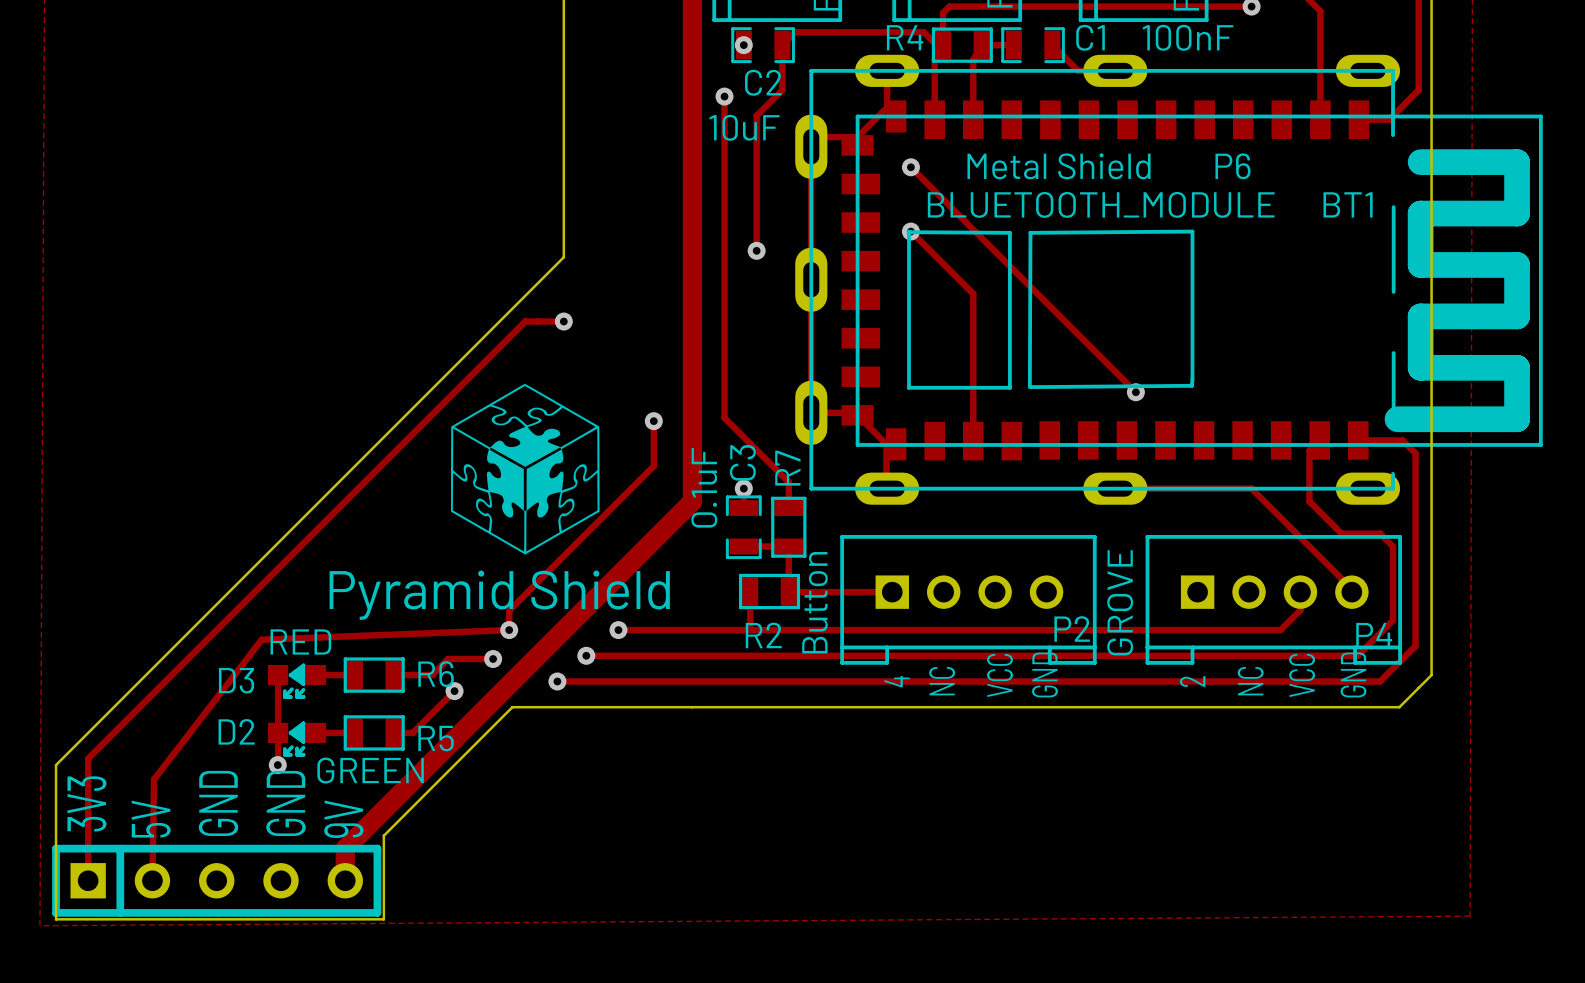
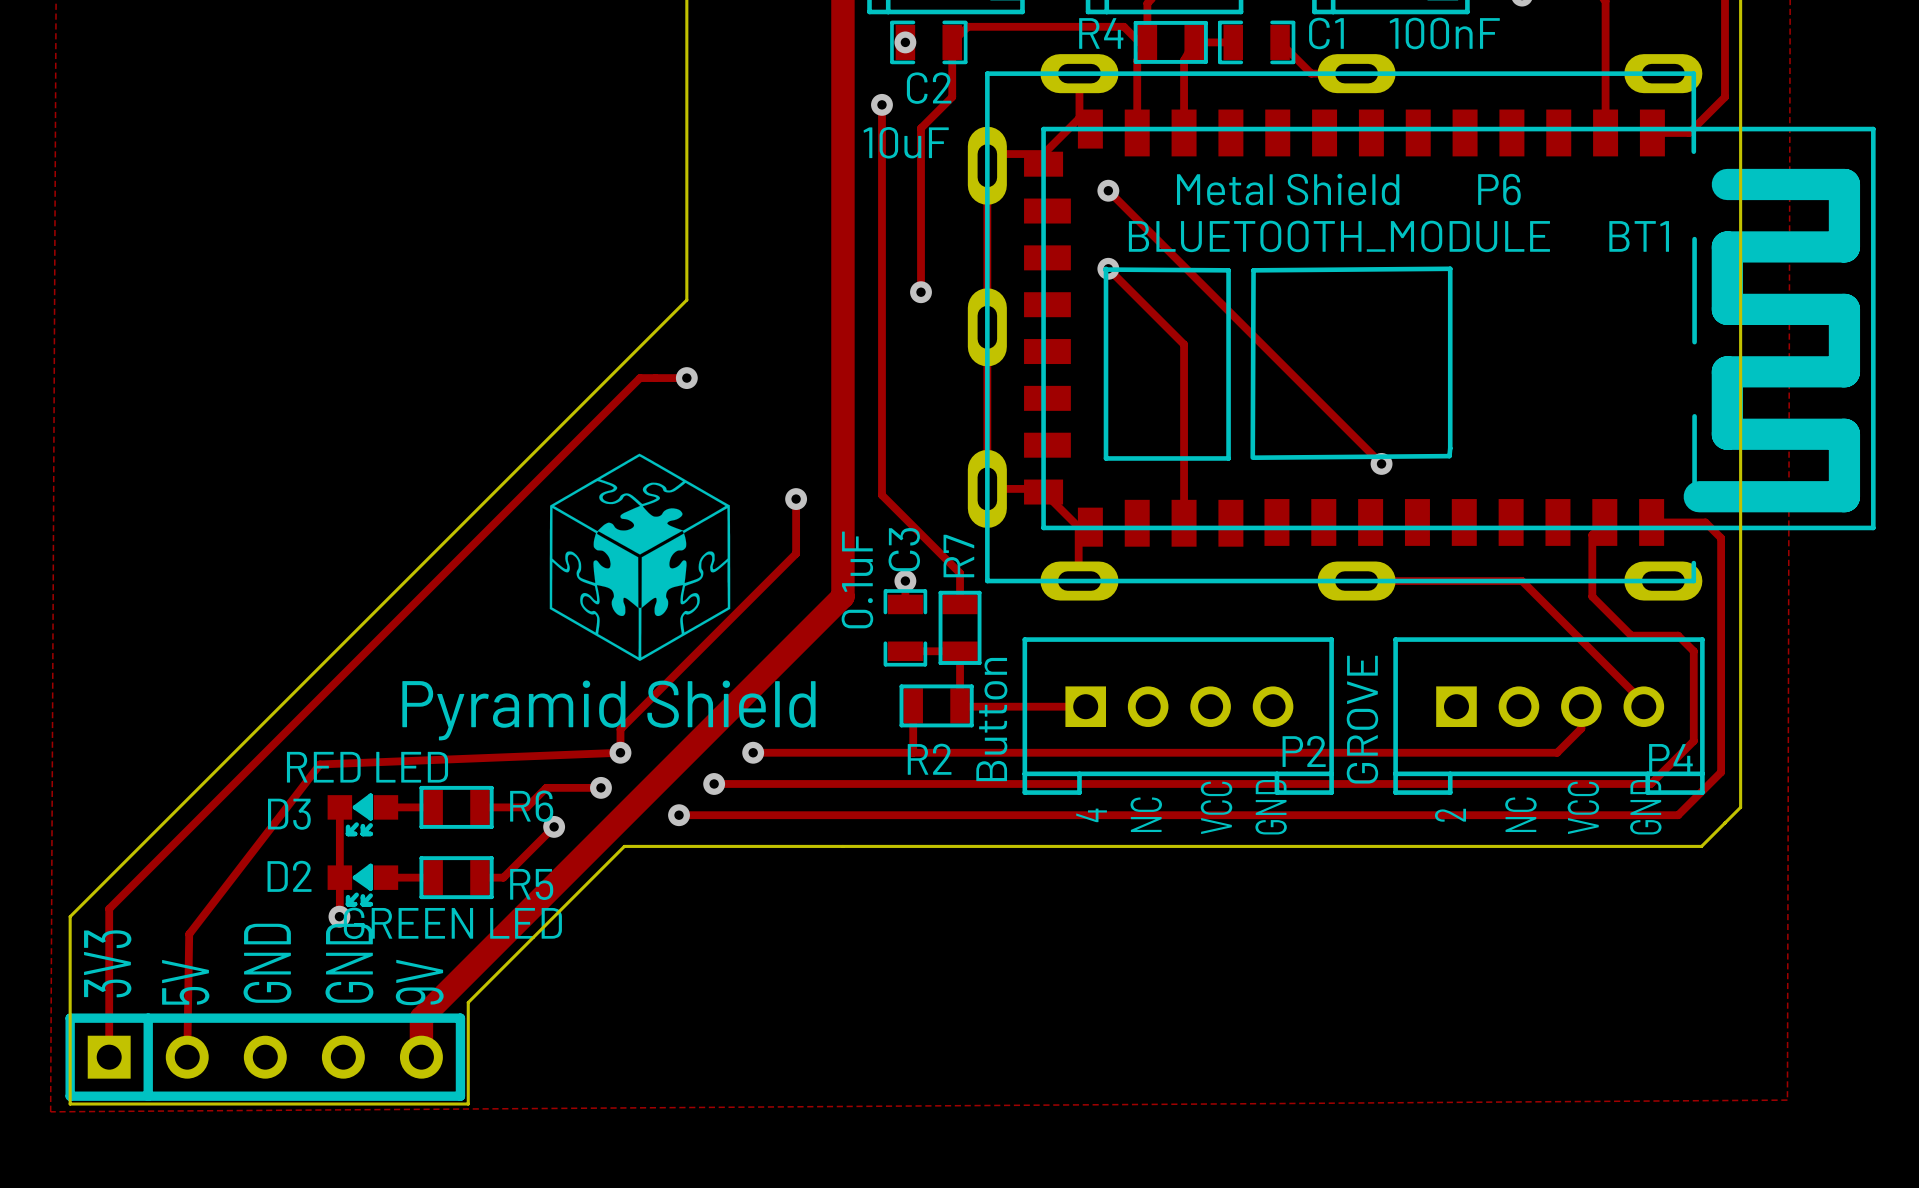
D3 value: RED (300, 641) -> RED LED (367, 767)
D2 value: GREEN (370, 770) -> GREEN LED (452, 923)

